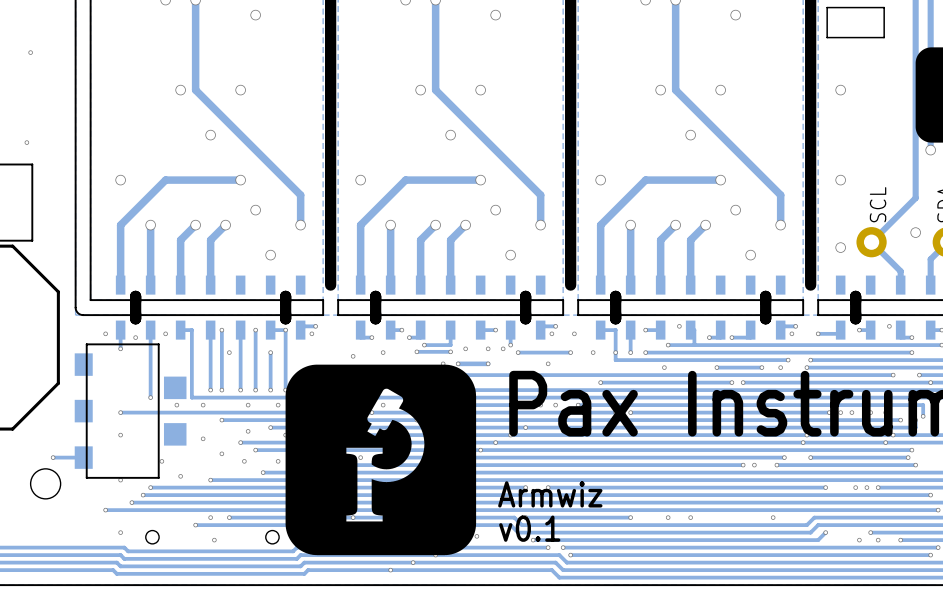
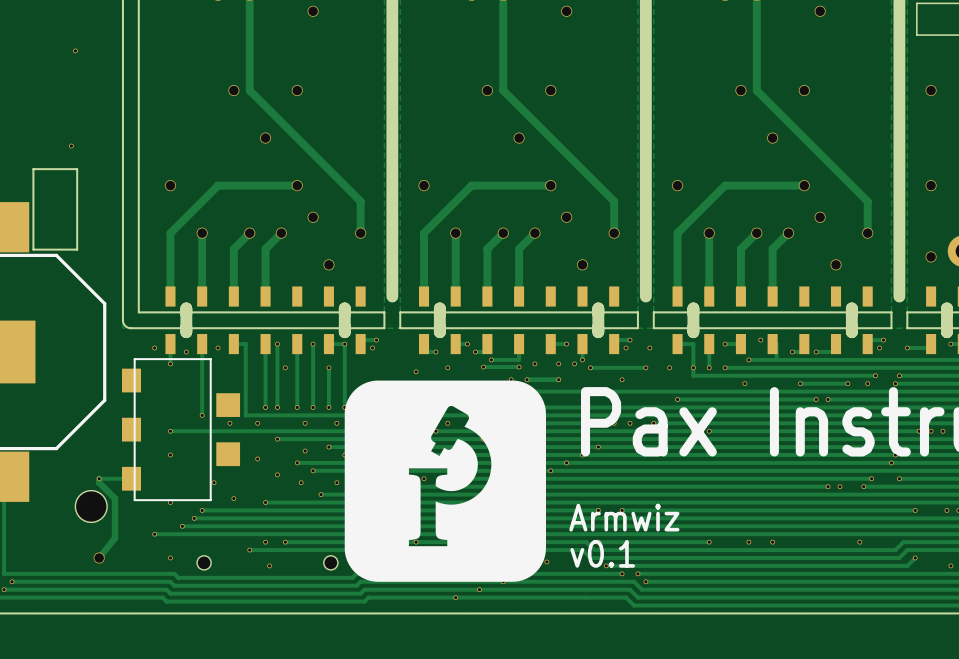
track: none -> (99, 478) (99, 482) (115, 498) (115, 538) (99, 557)
via: none -> (99, 557)

